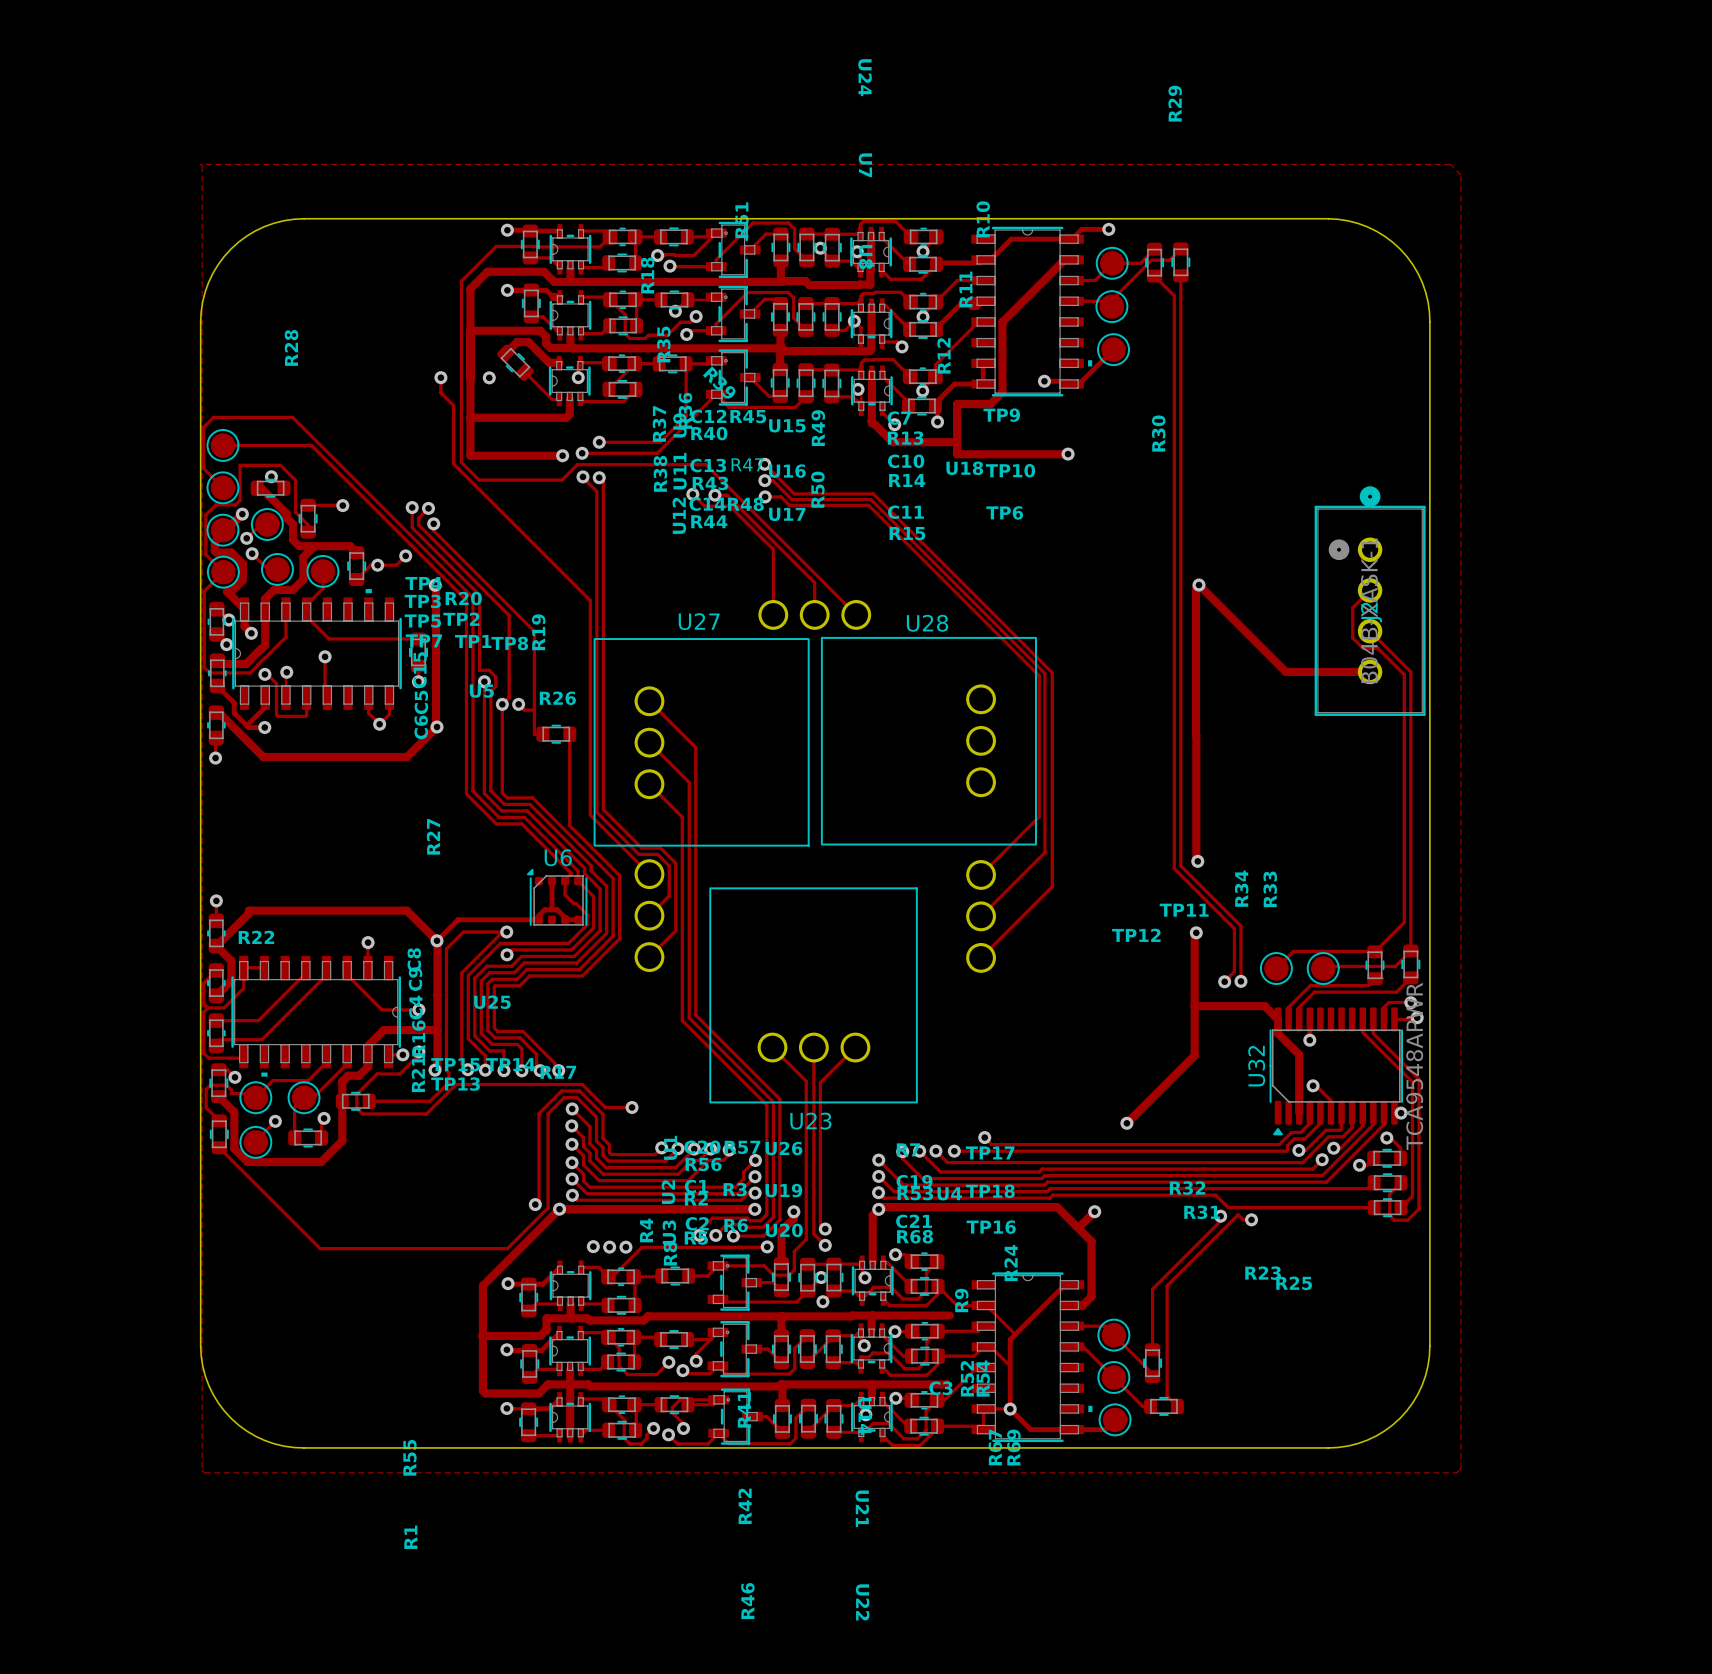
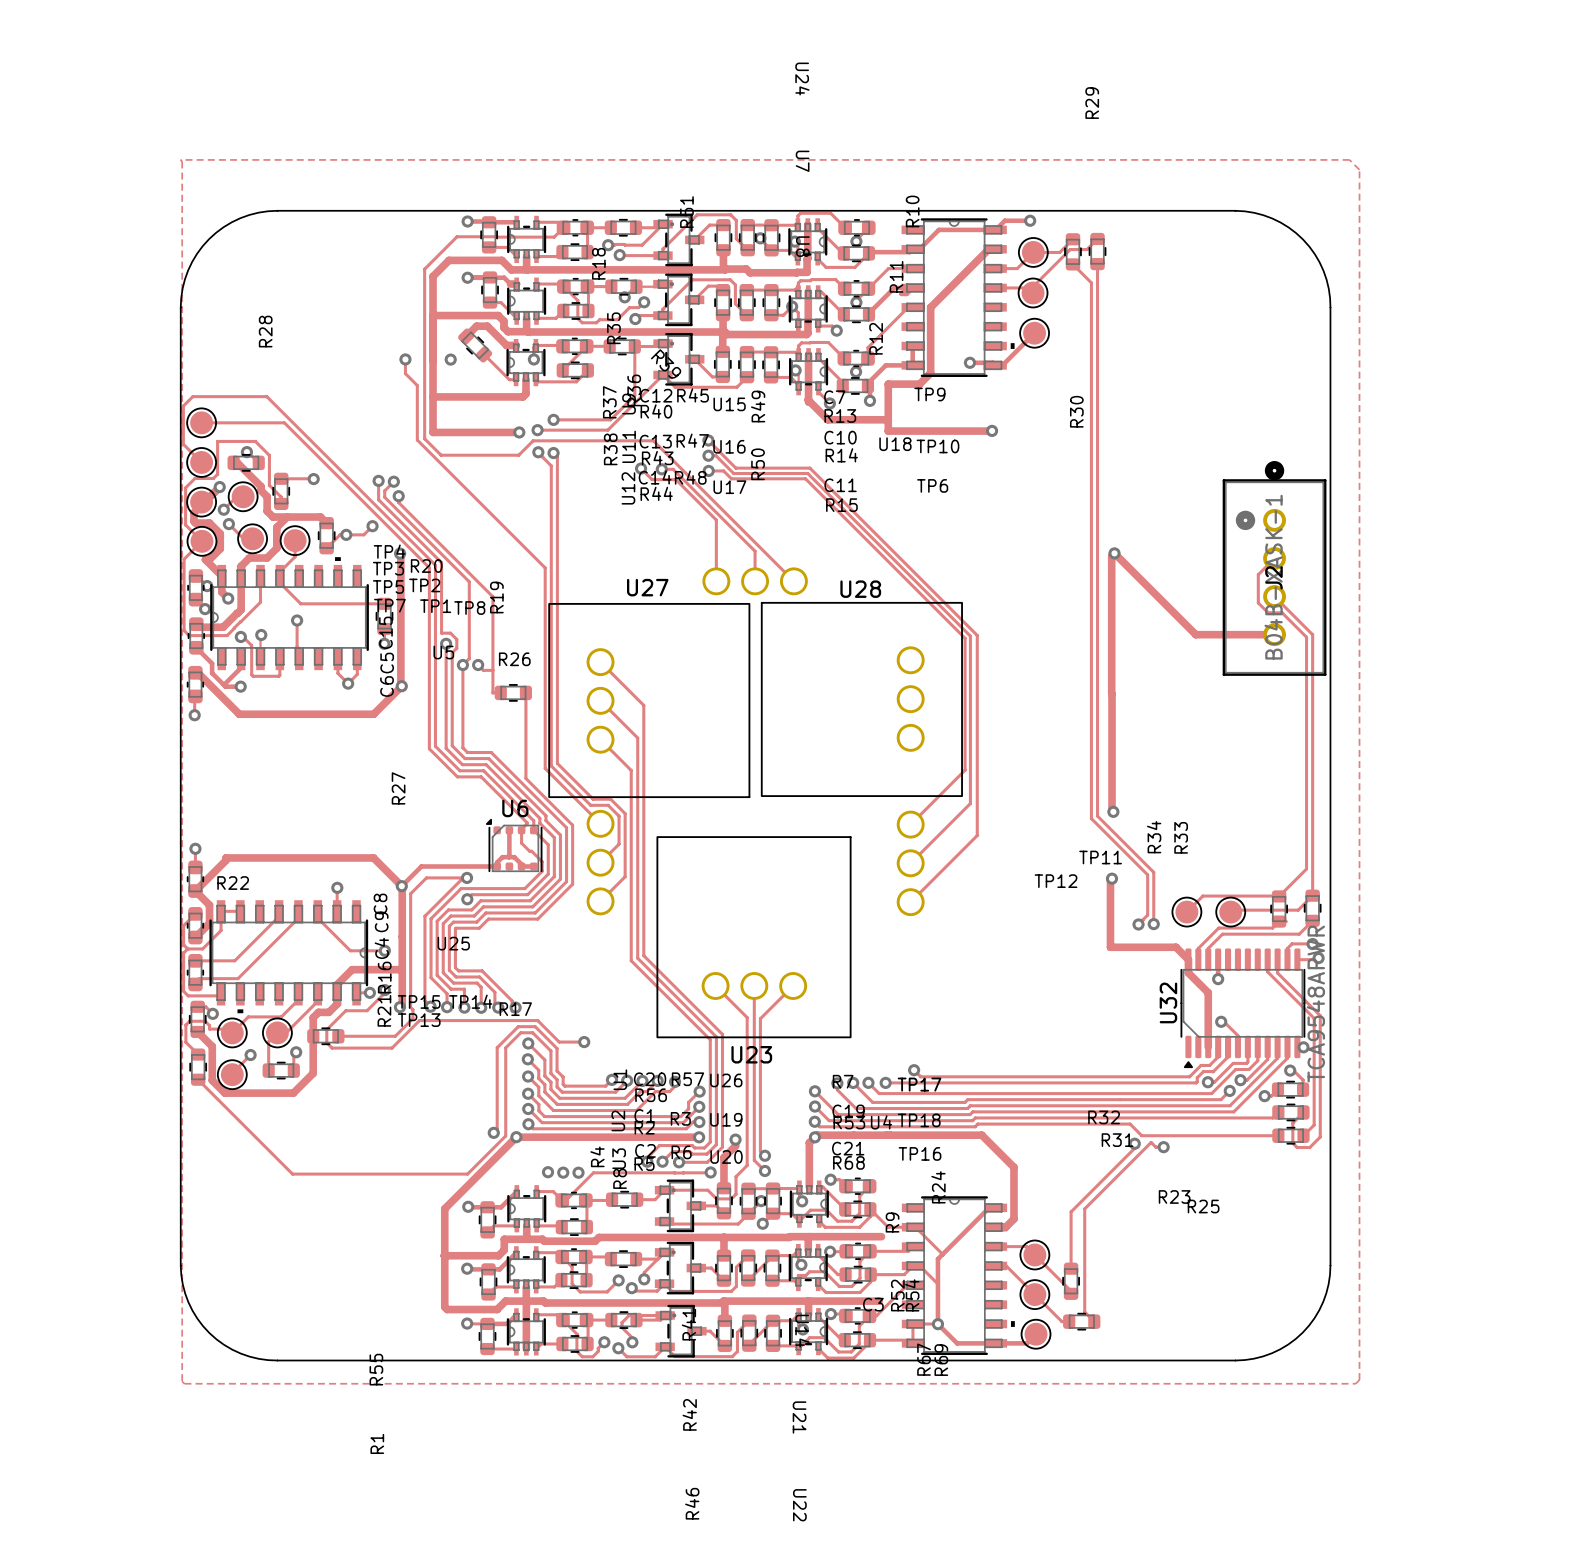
track: (1194, 1006) (1194, 1055) (1126, 1123) -> none
via: (1126, 1123) -> none
track: (1094, 1211) (1080, 1226) (1076, 1226) -> none
via: (1094, 1211) -> none

